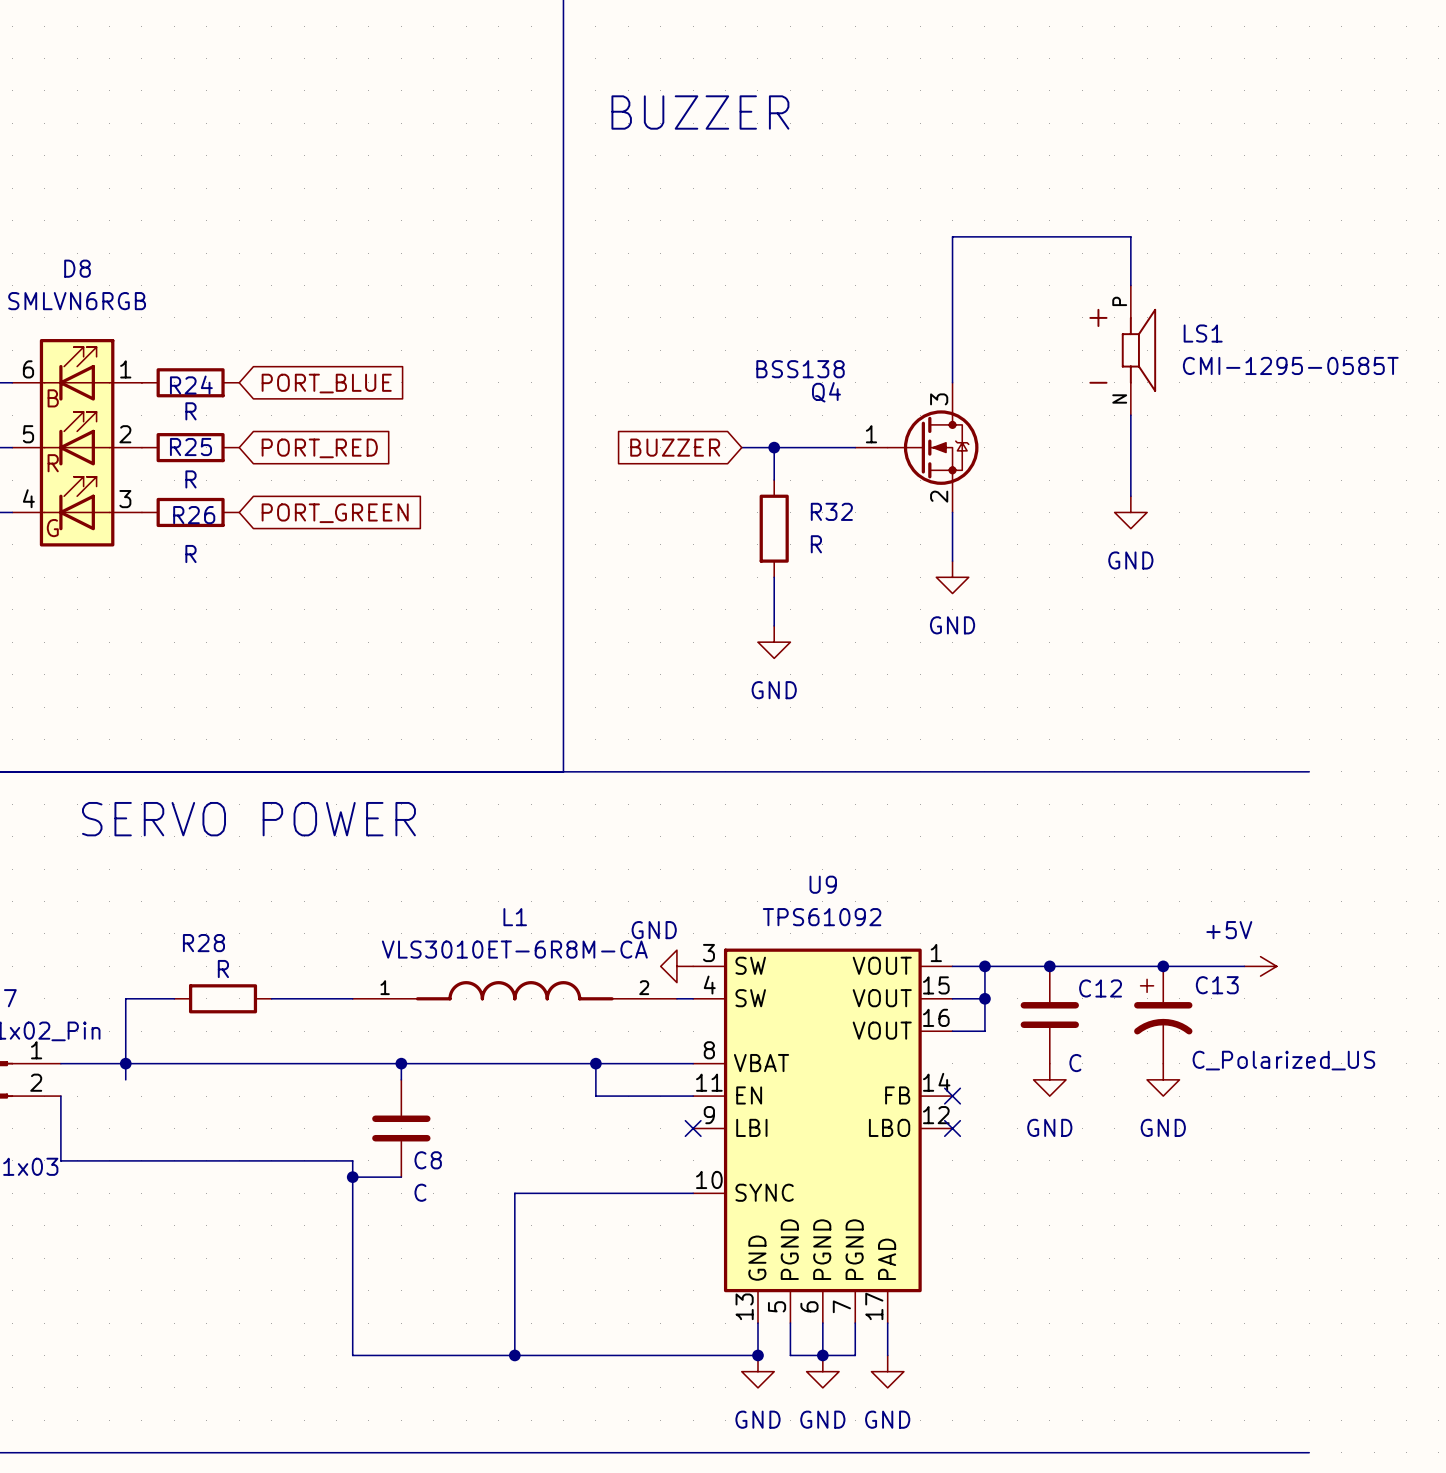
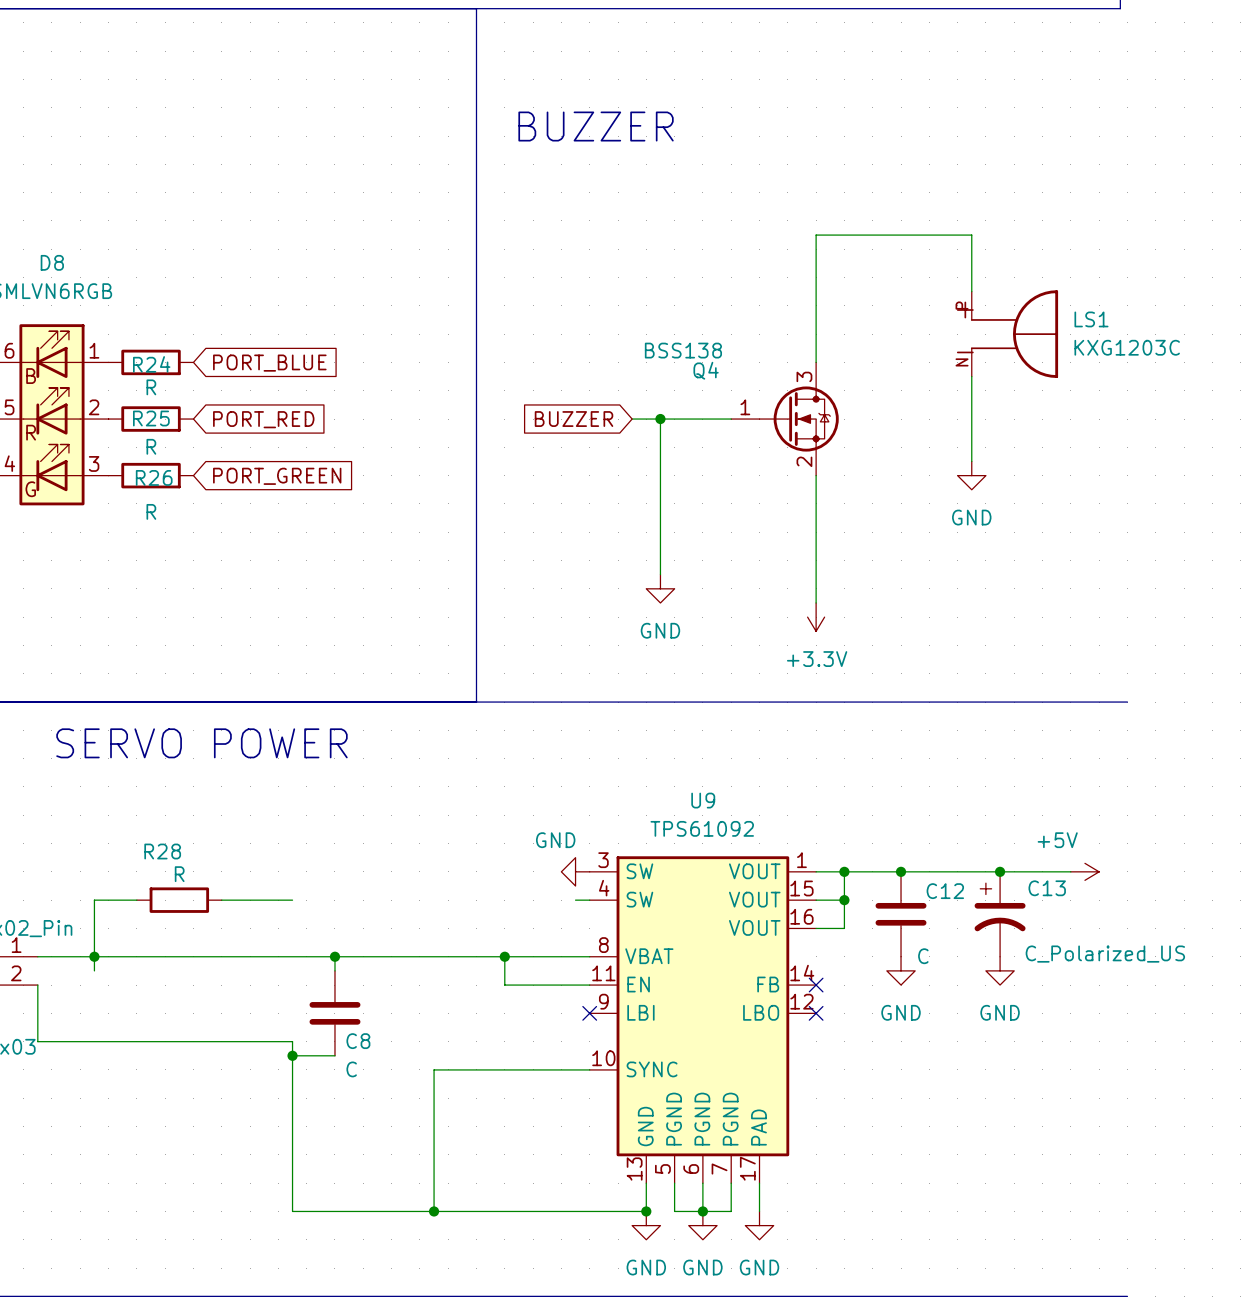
LS1 symbol: [1089, 285, 1157, 416] -> [970, 290, 1059, 378]
LS1 value: CMI-1295-0585T (1290, 365) -> KXG1203C (1127, 347)
wire: none -> (660, 447) (660, 532)
R32: R (774, 528) -> none
wire: none -> (816, 518) (816, 602)
power symbol: GND (952, 577) -> none
power symbol: none -> +3.3V (816, 617)
L1: VLS3010ET-6R8M-CA (514, 990) -> none

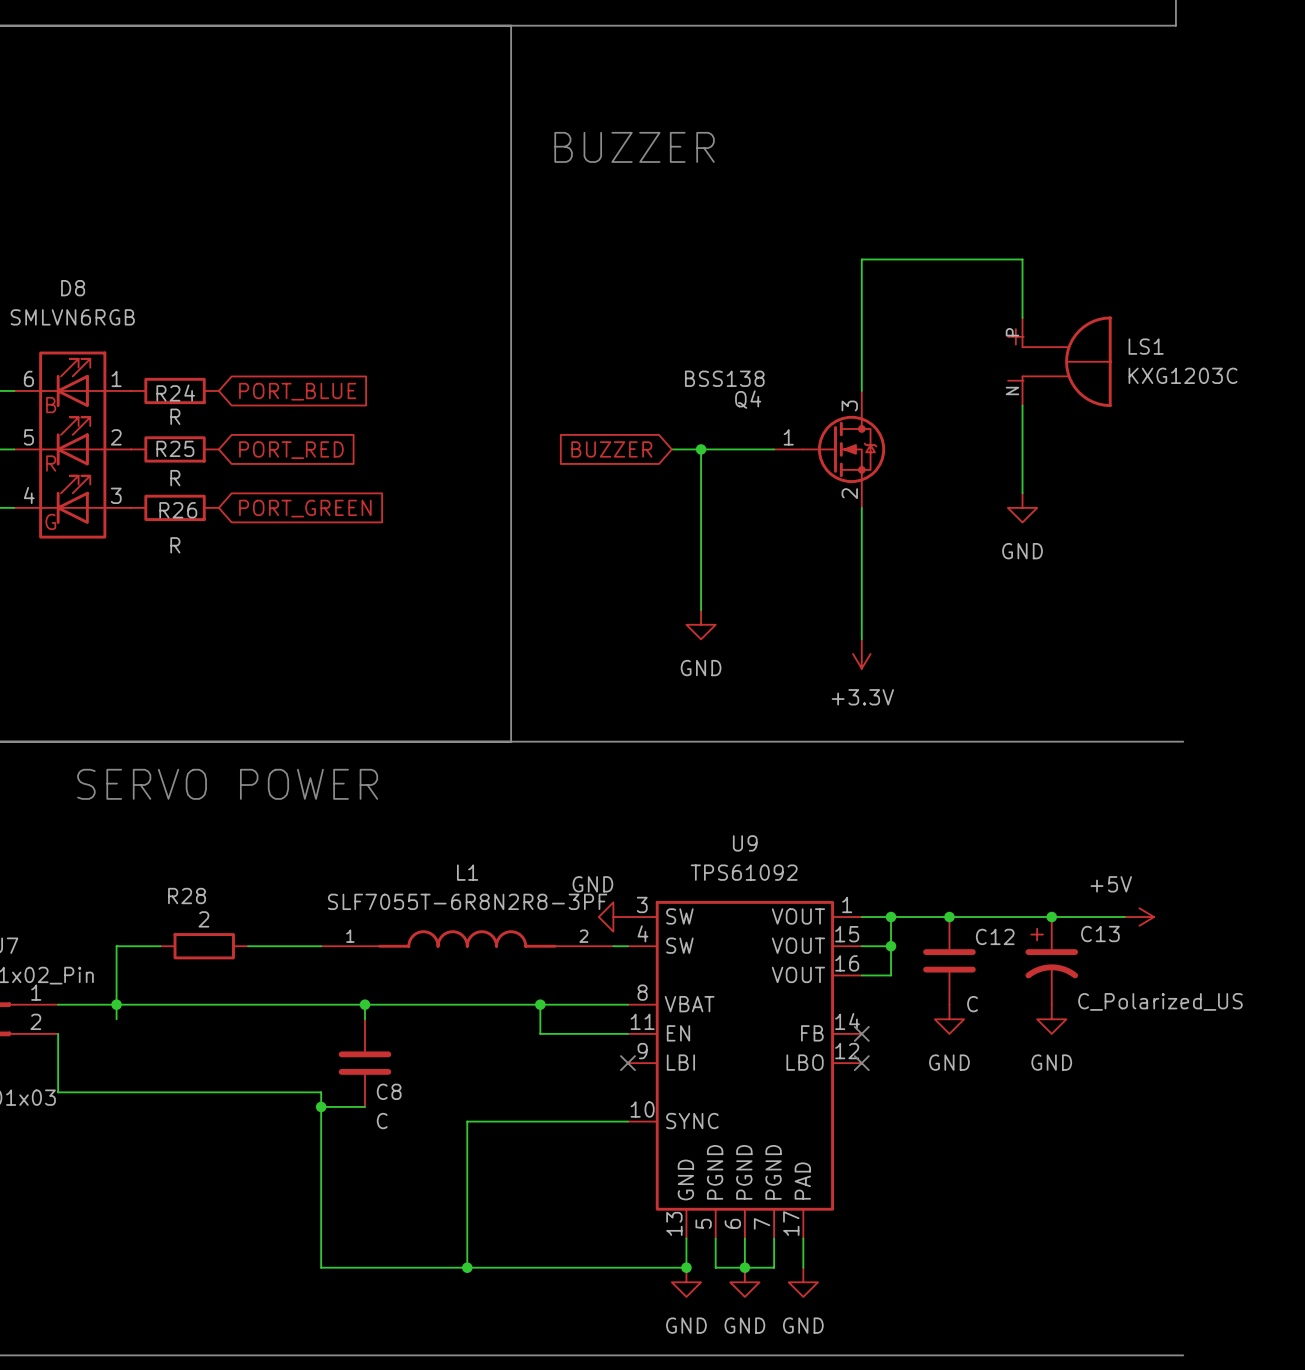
R28 value: R (179, 874) -> 2 (203, 919)
L1: none -> SLF7055T-6R8N2R8-3PF (467, 938)

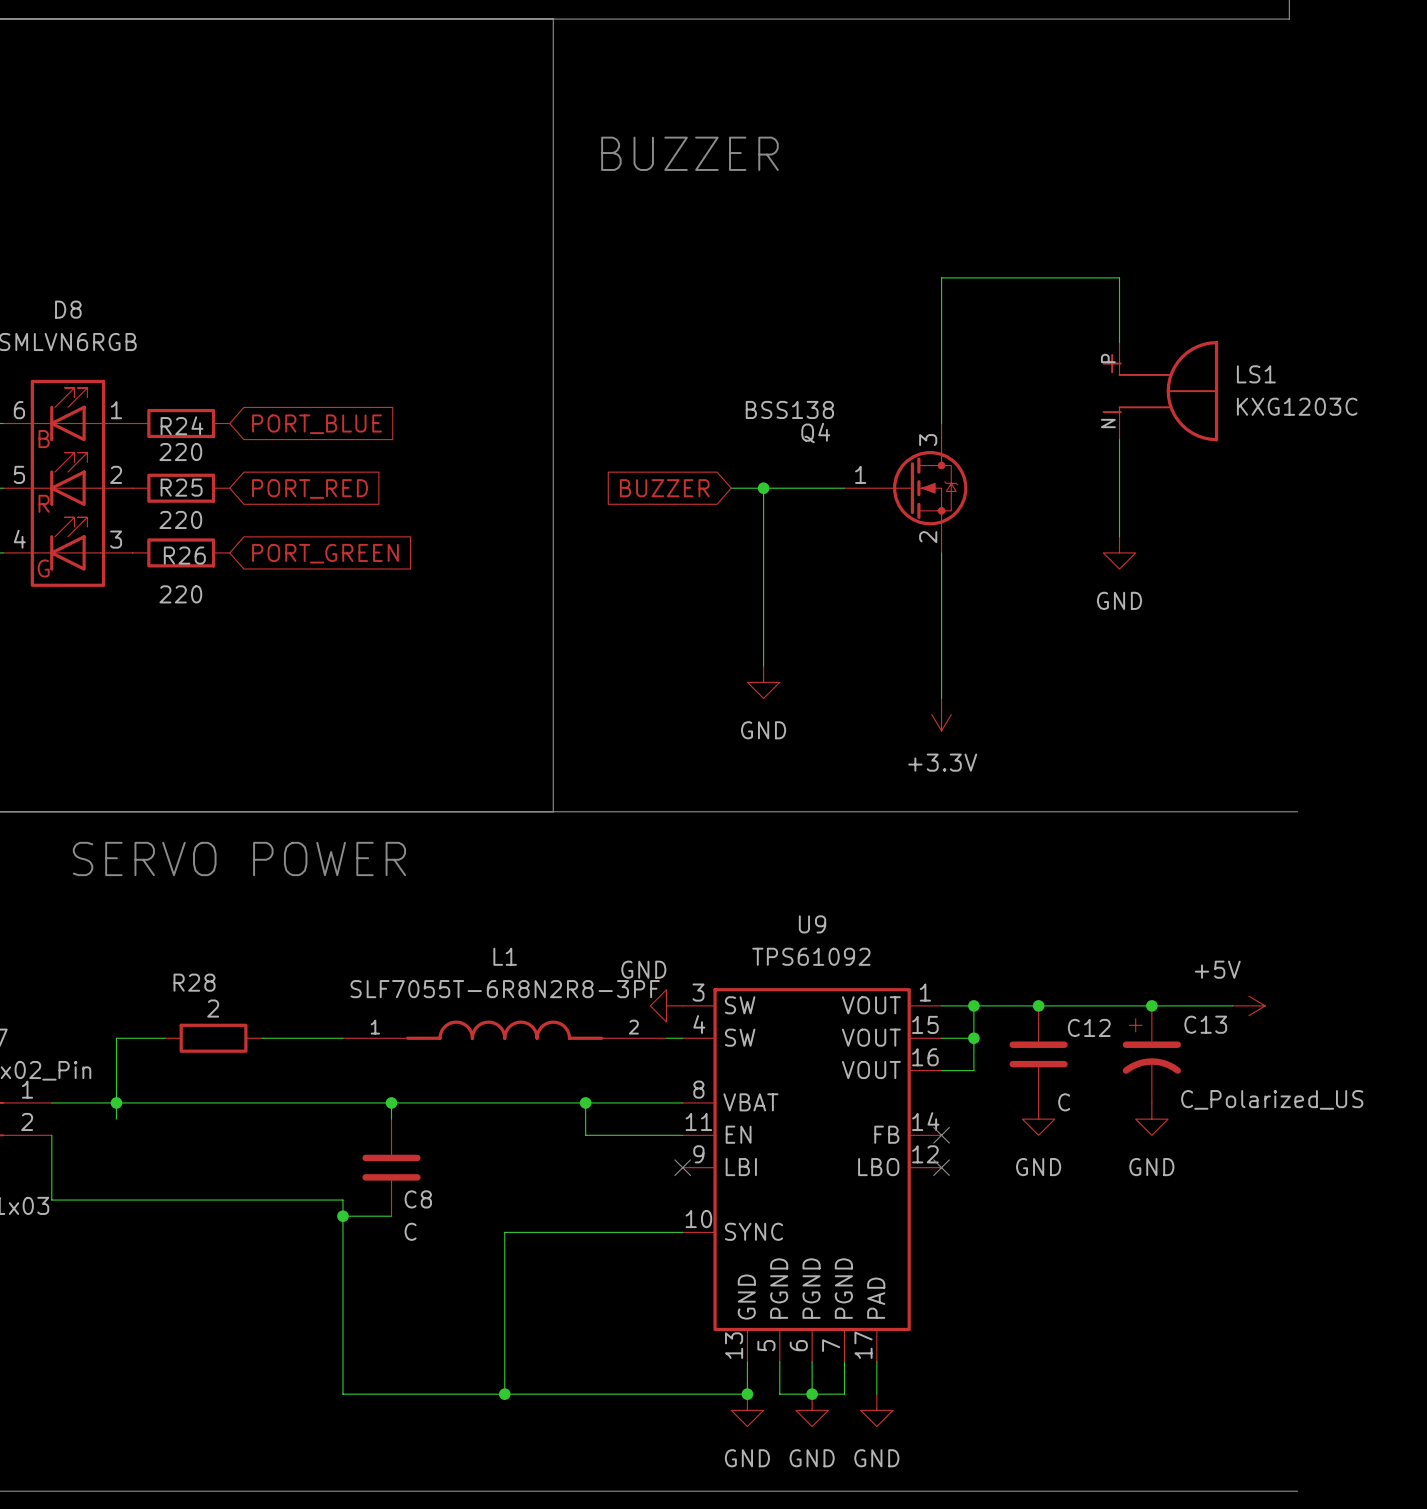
R24 value: R (175, 416) -> 220 (180, 452)
R25 value: R (175, 478) -> 220 (180, 519)
R26 value: R (175, 545) -> 220 (180, 594)

